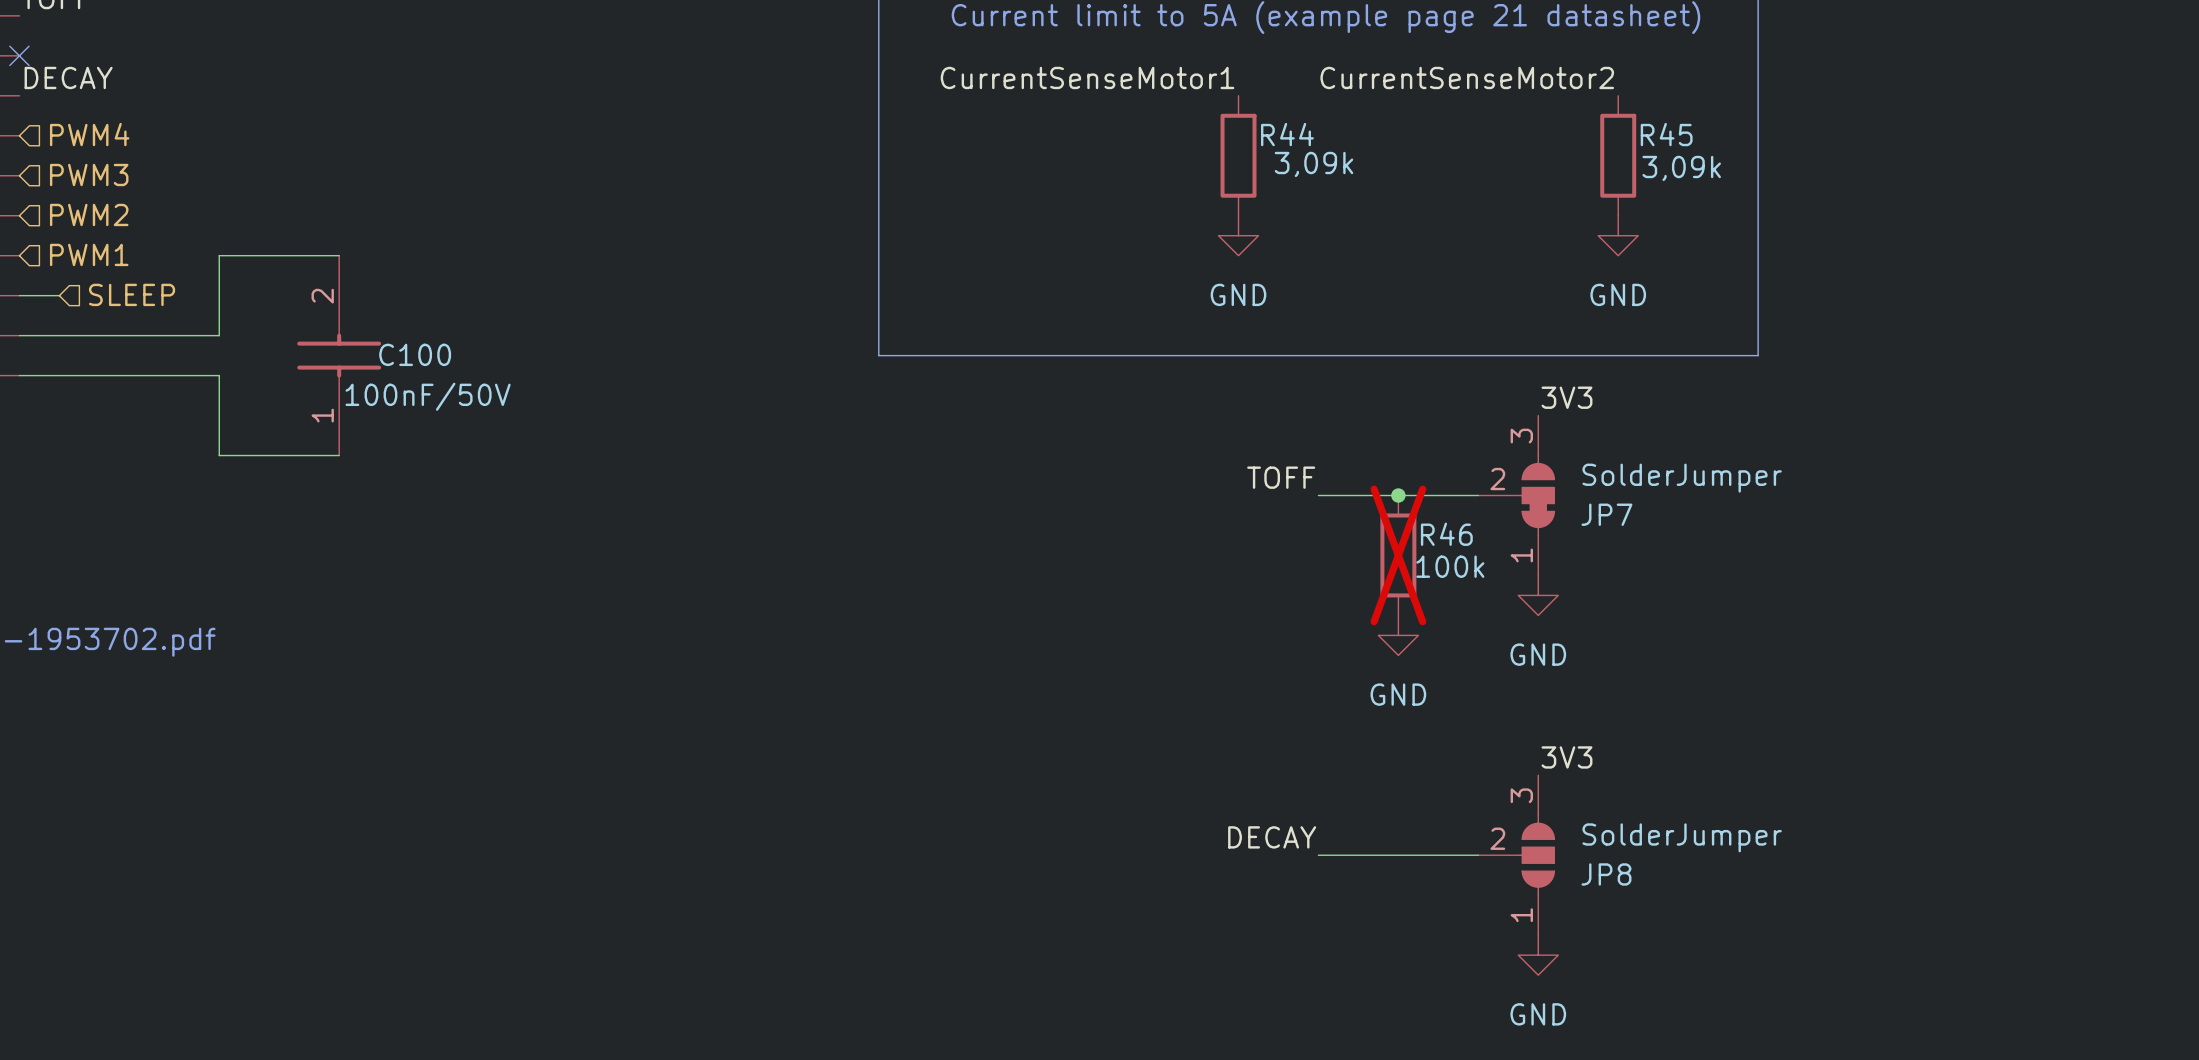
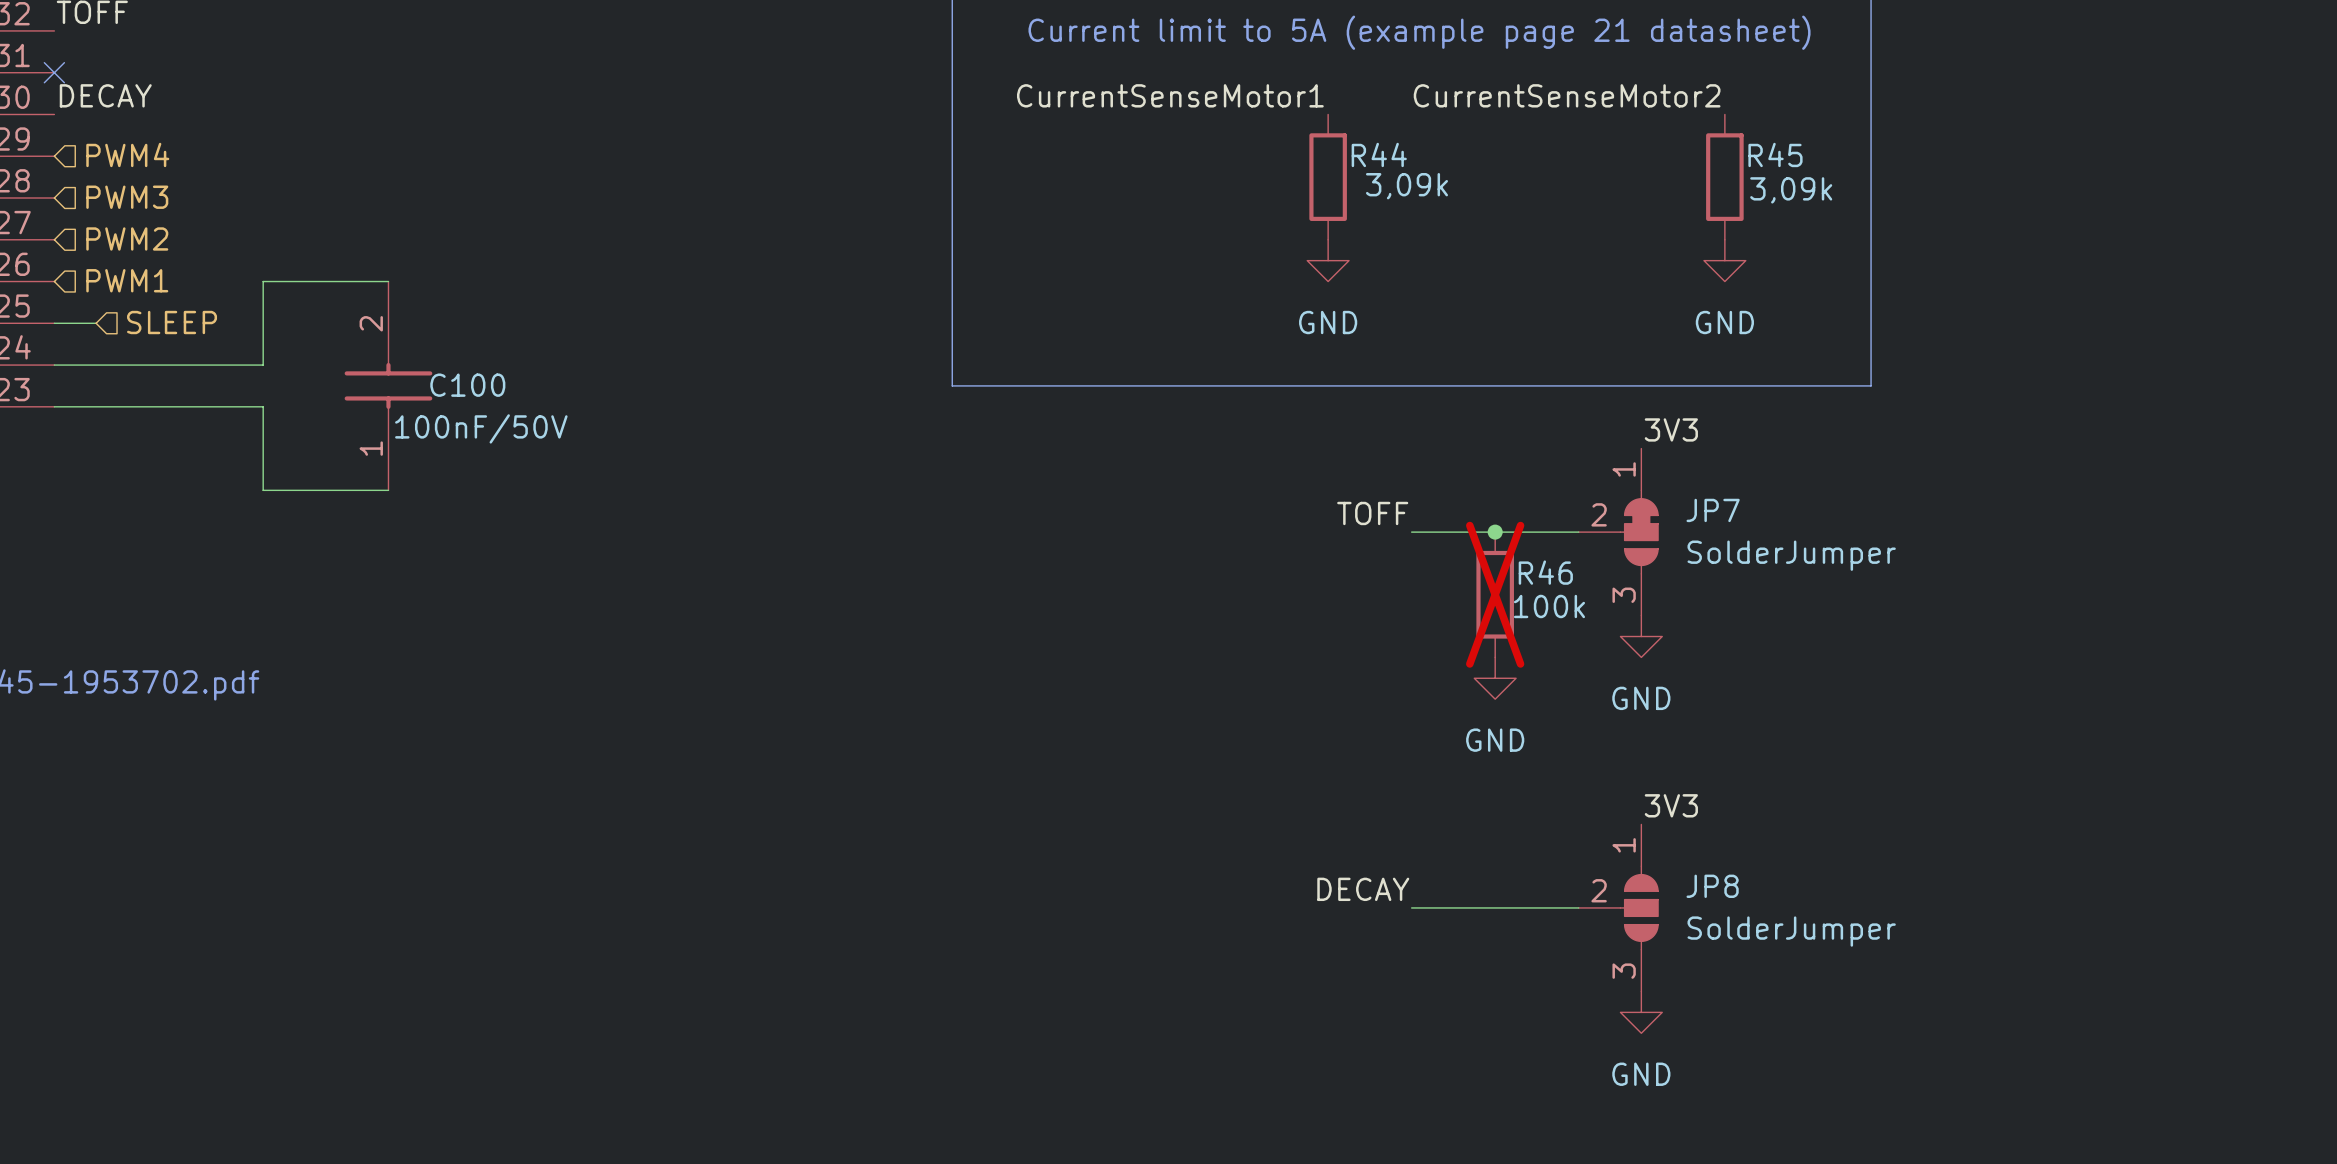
JP7 flip: as is (1536, 495) -> up-down (1639, 532)
JP8 flip: as is (1536, 855) -> up-down (1639, 907)

